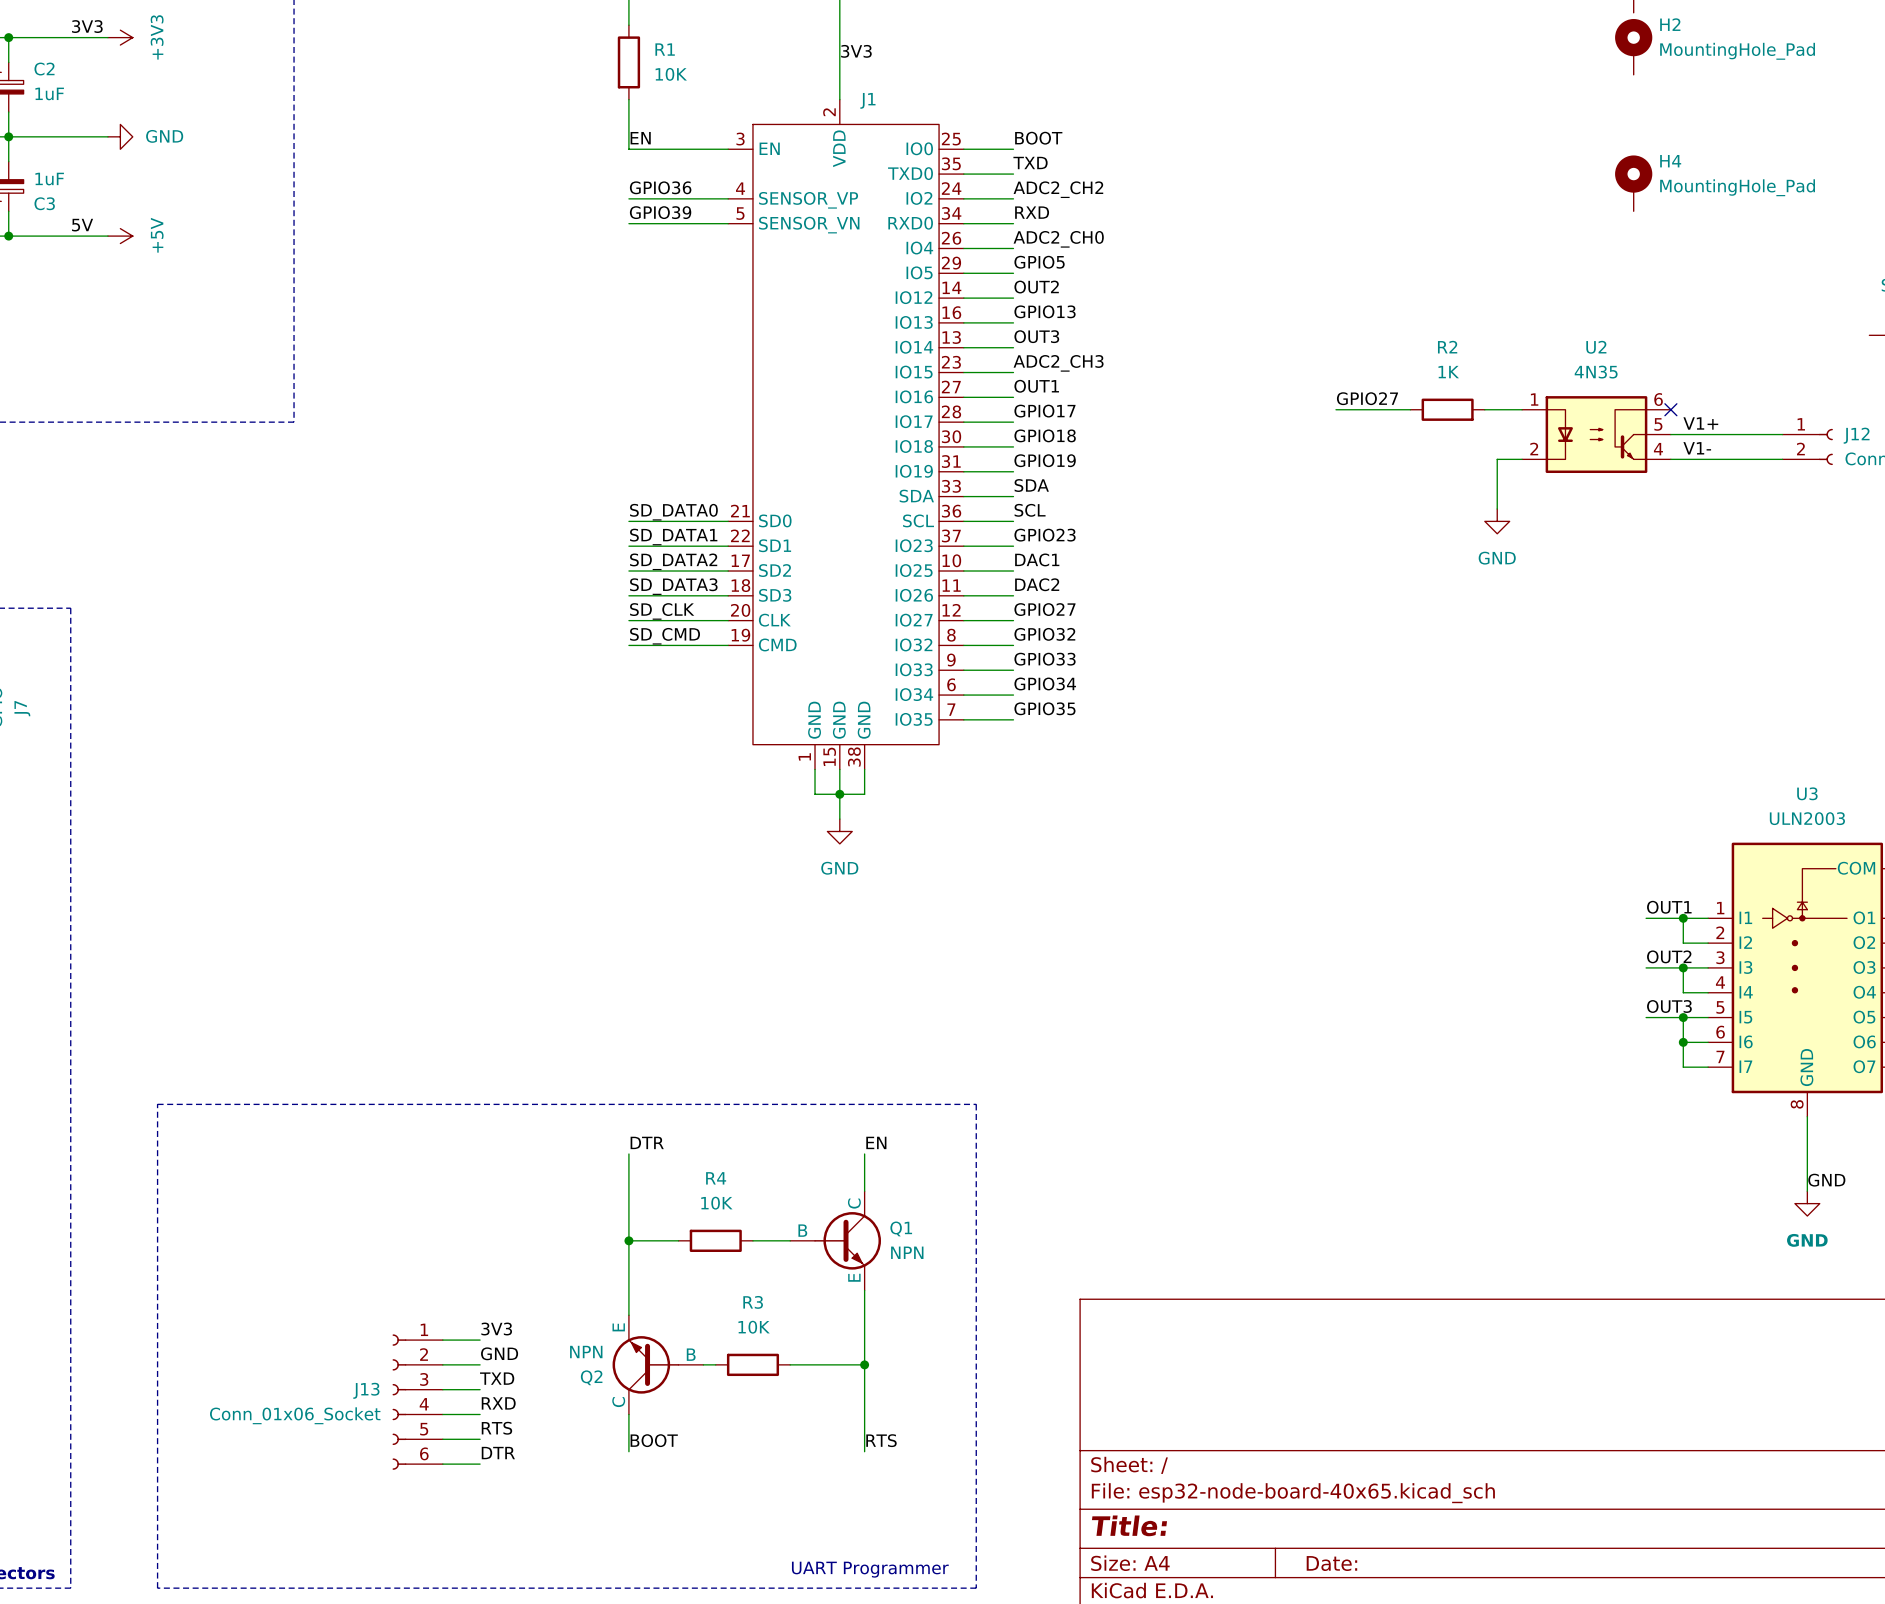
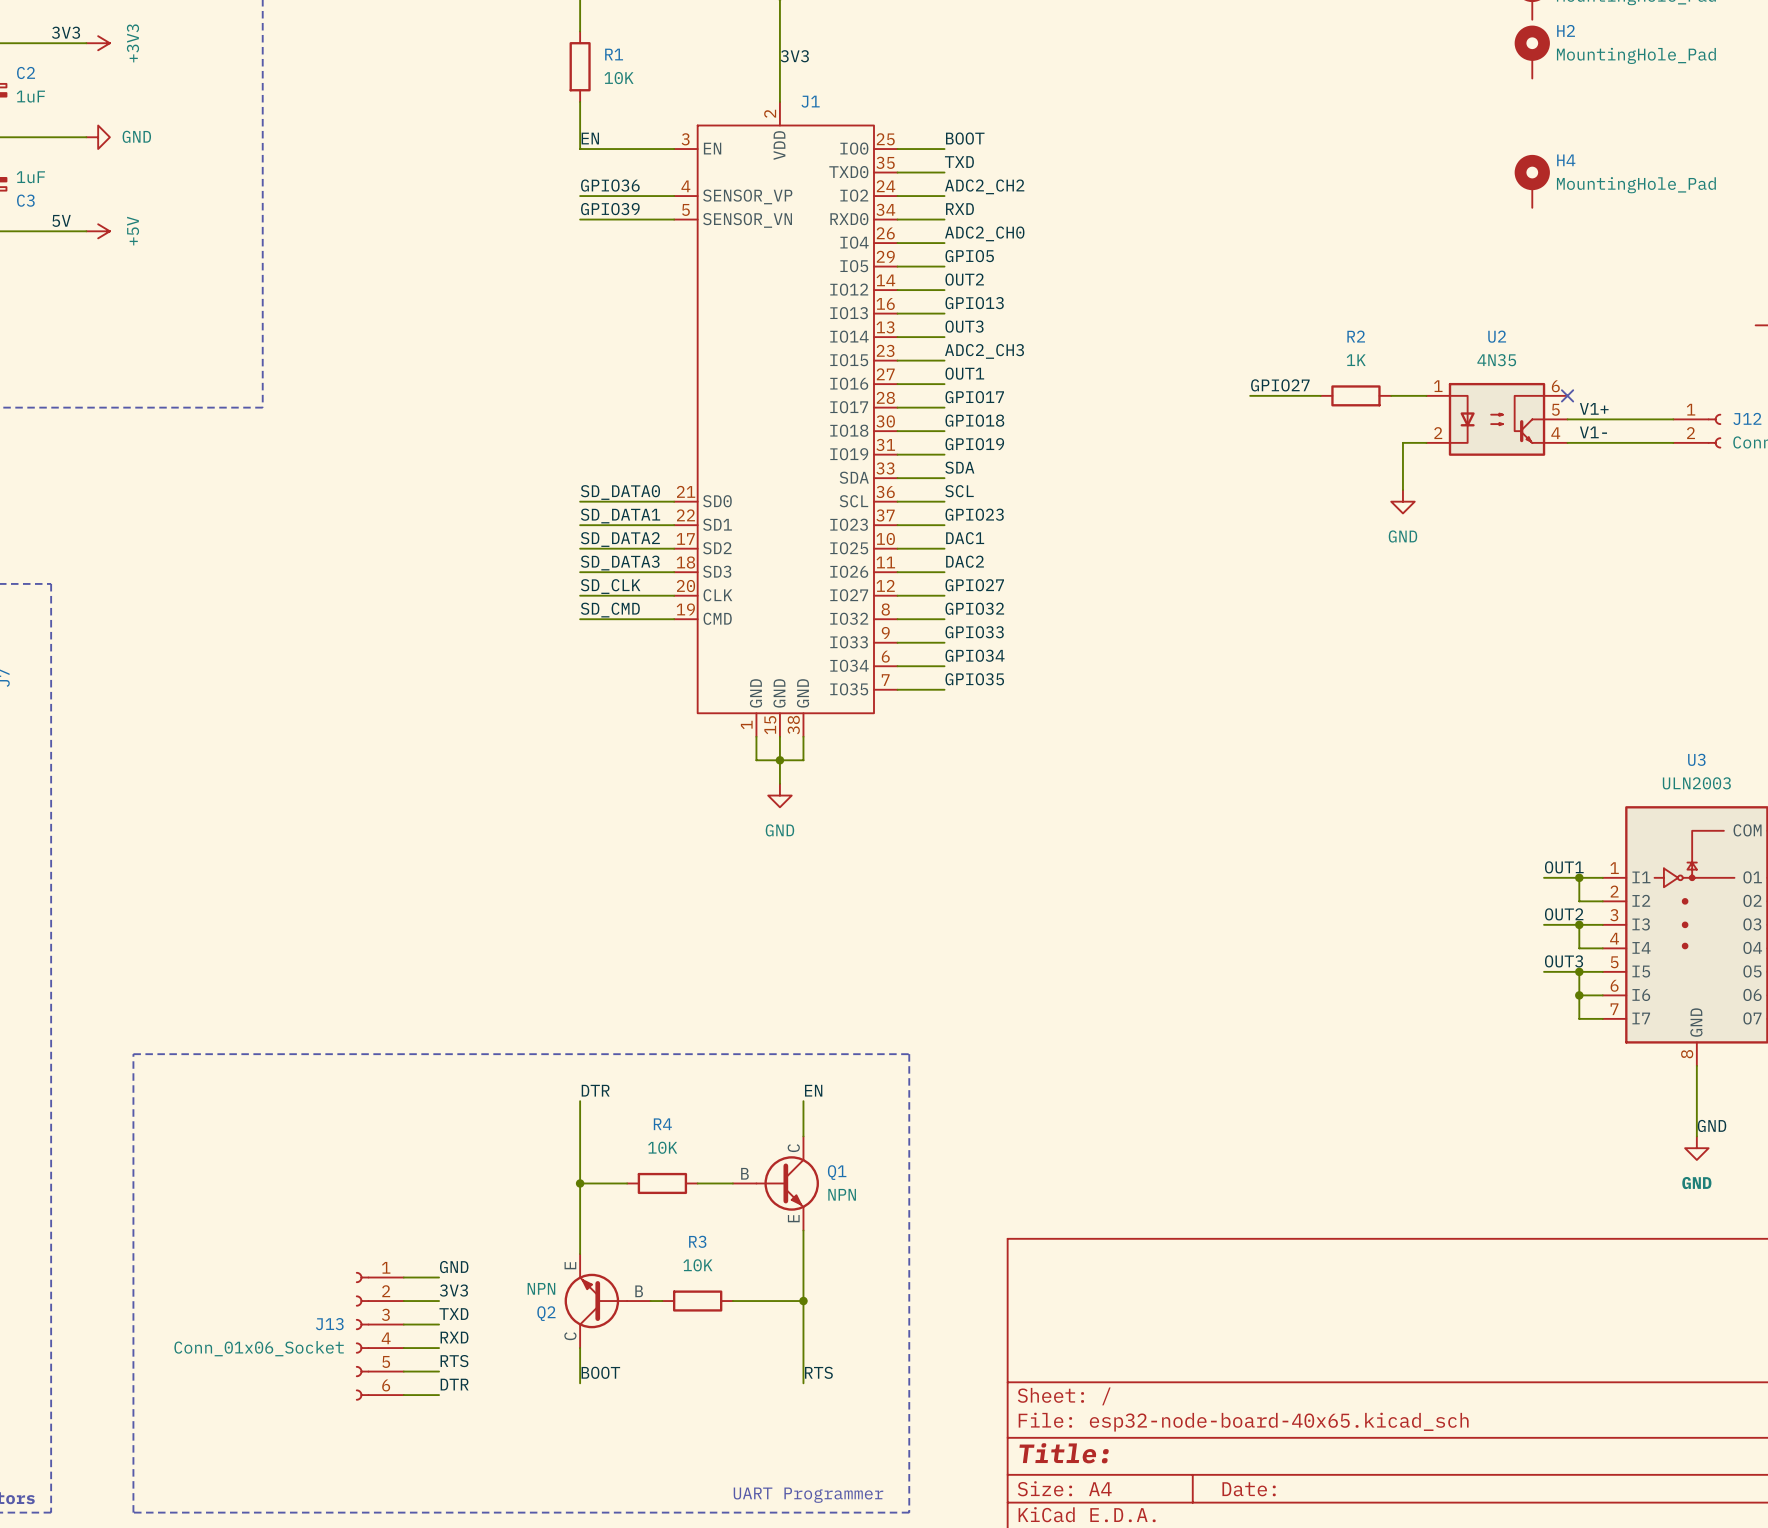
label: 3V3 (496, 1329) -> GND (454, 1267)
label: GND (499, 1353) -> 3V3 (453, 1290)

